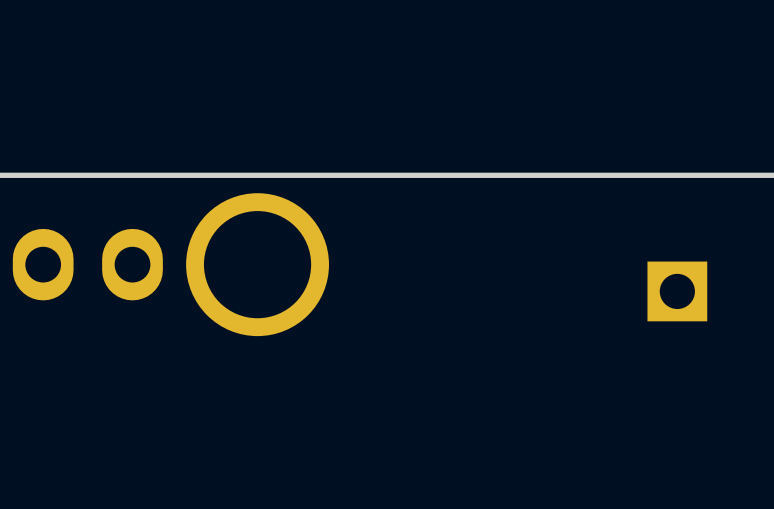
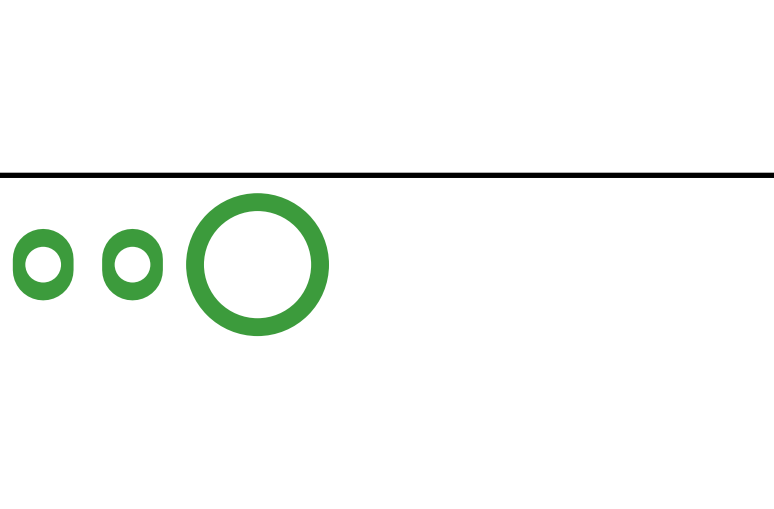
part: (677, 291) -> none

